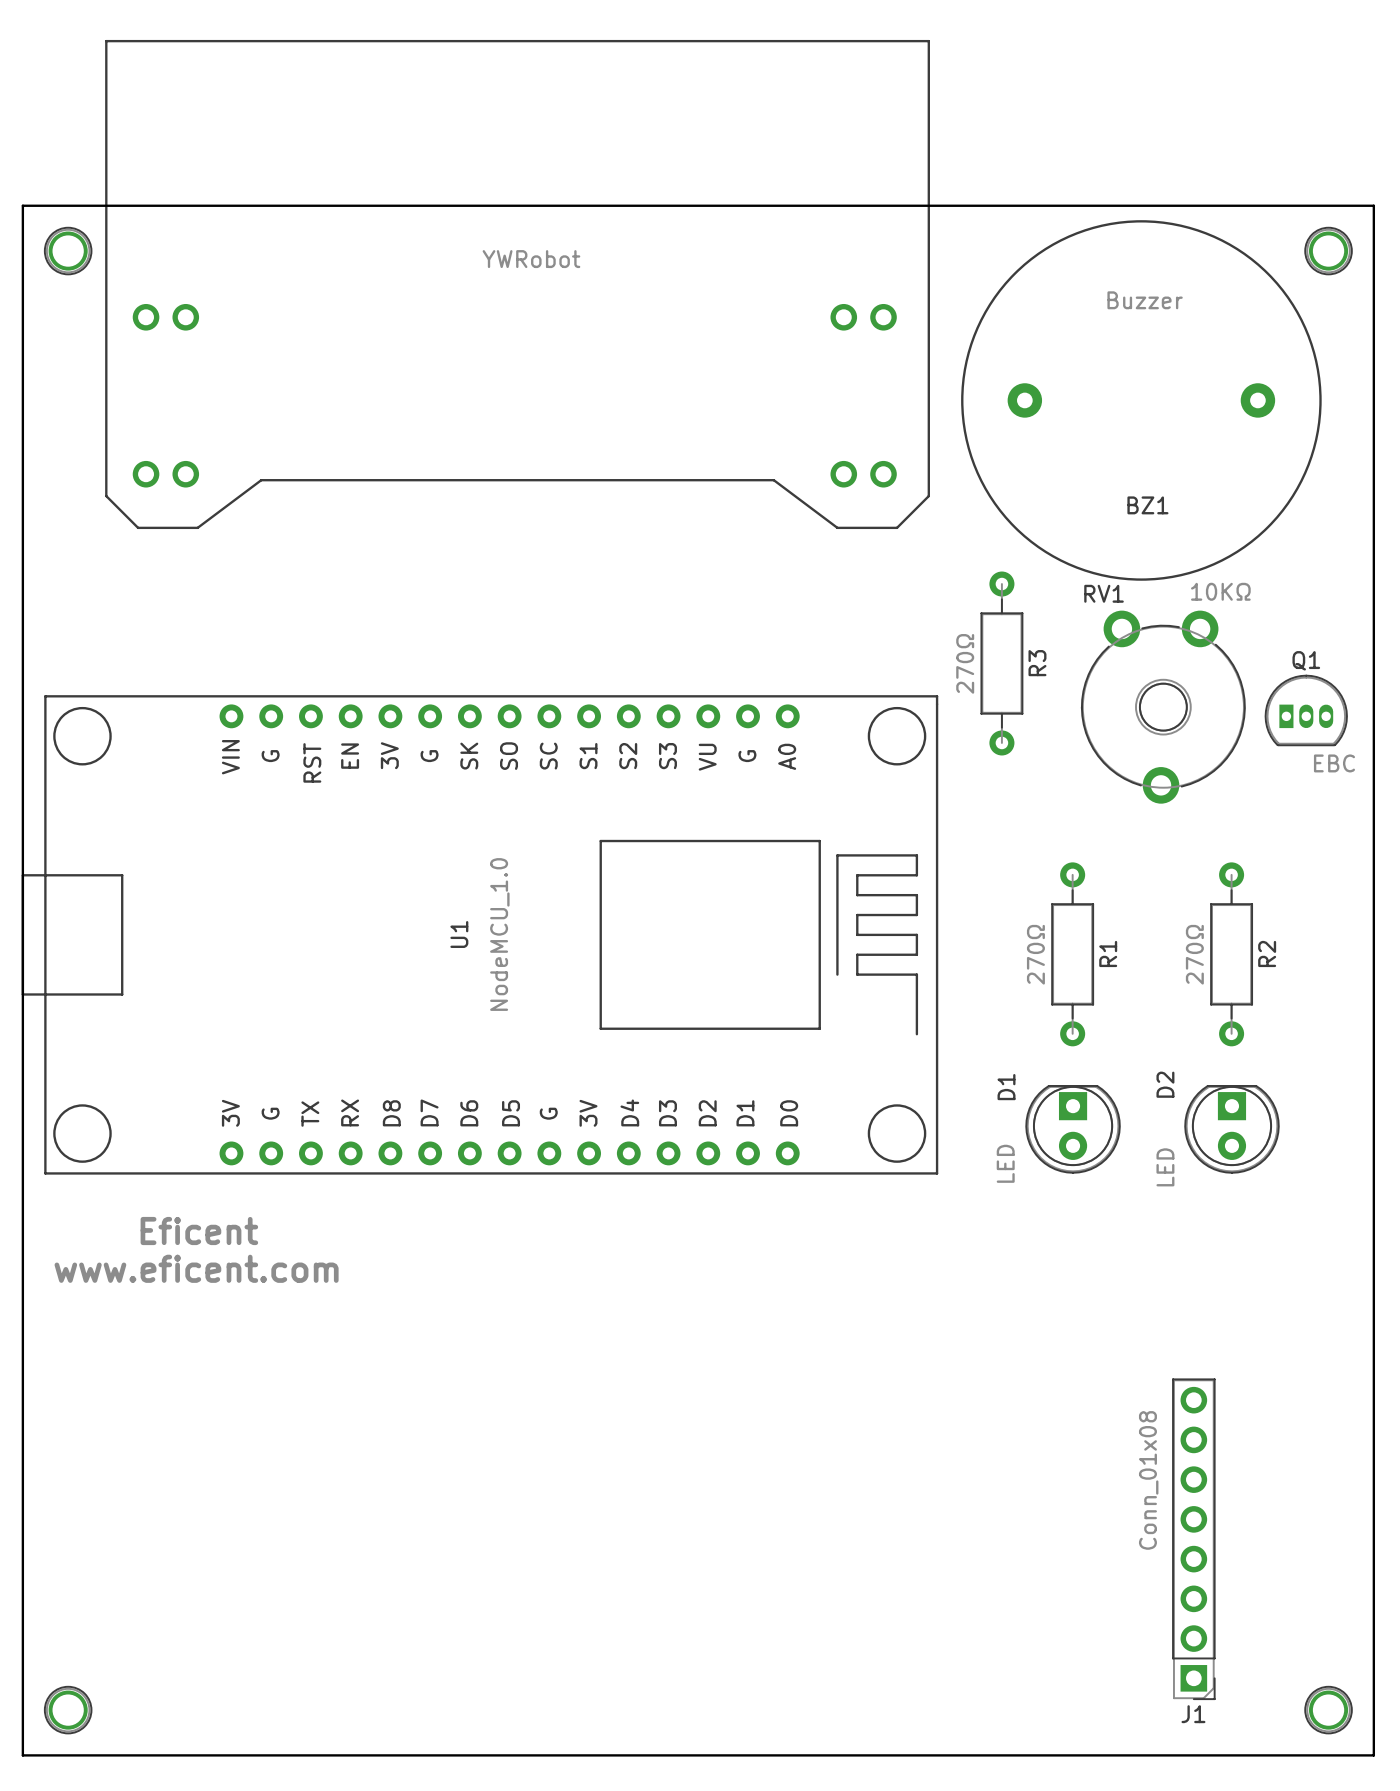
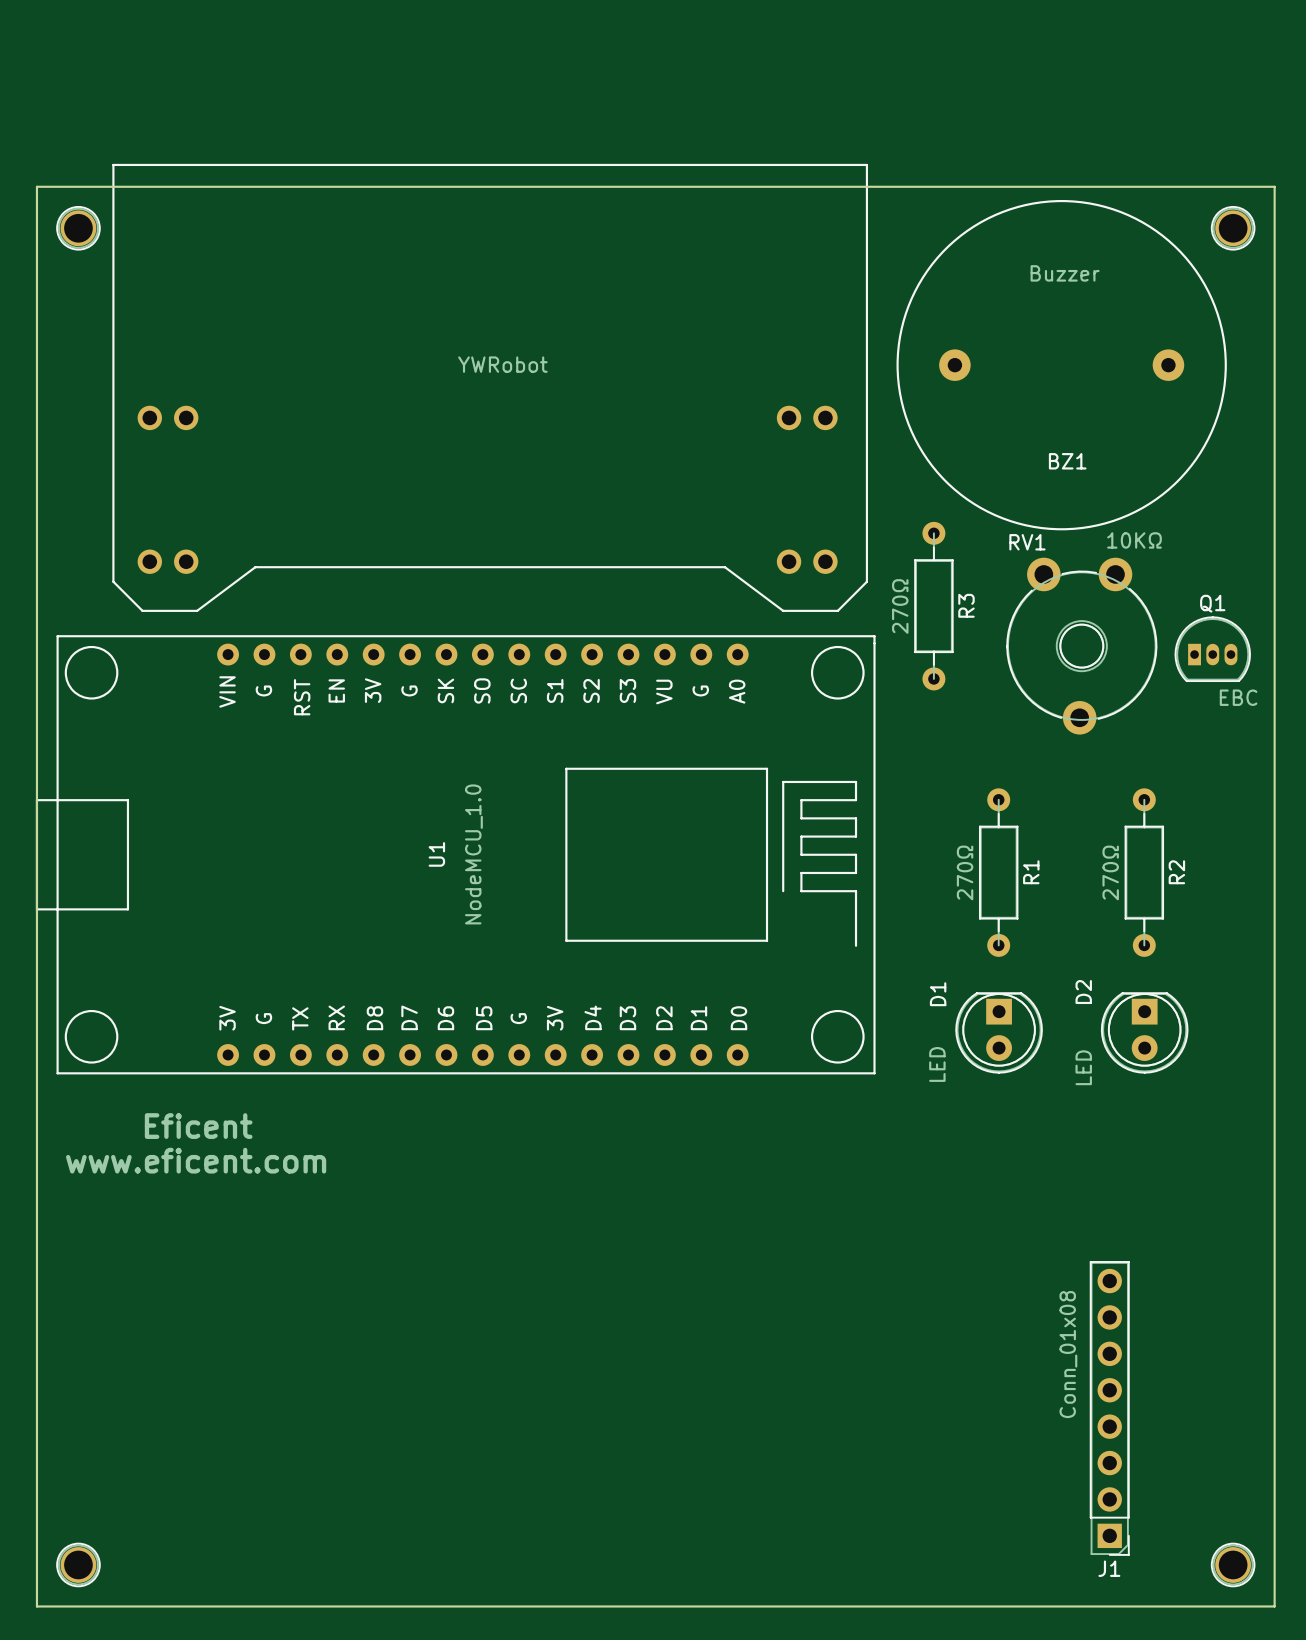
part position: (517, 284) -> (490, 387)

